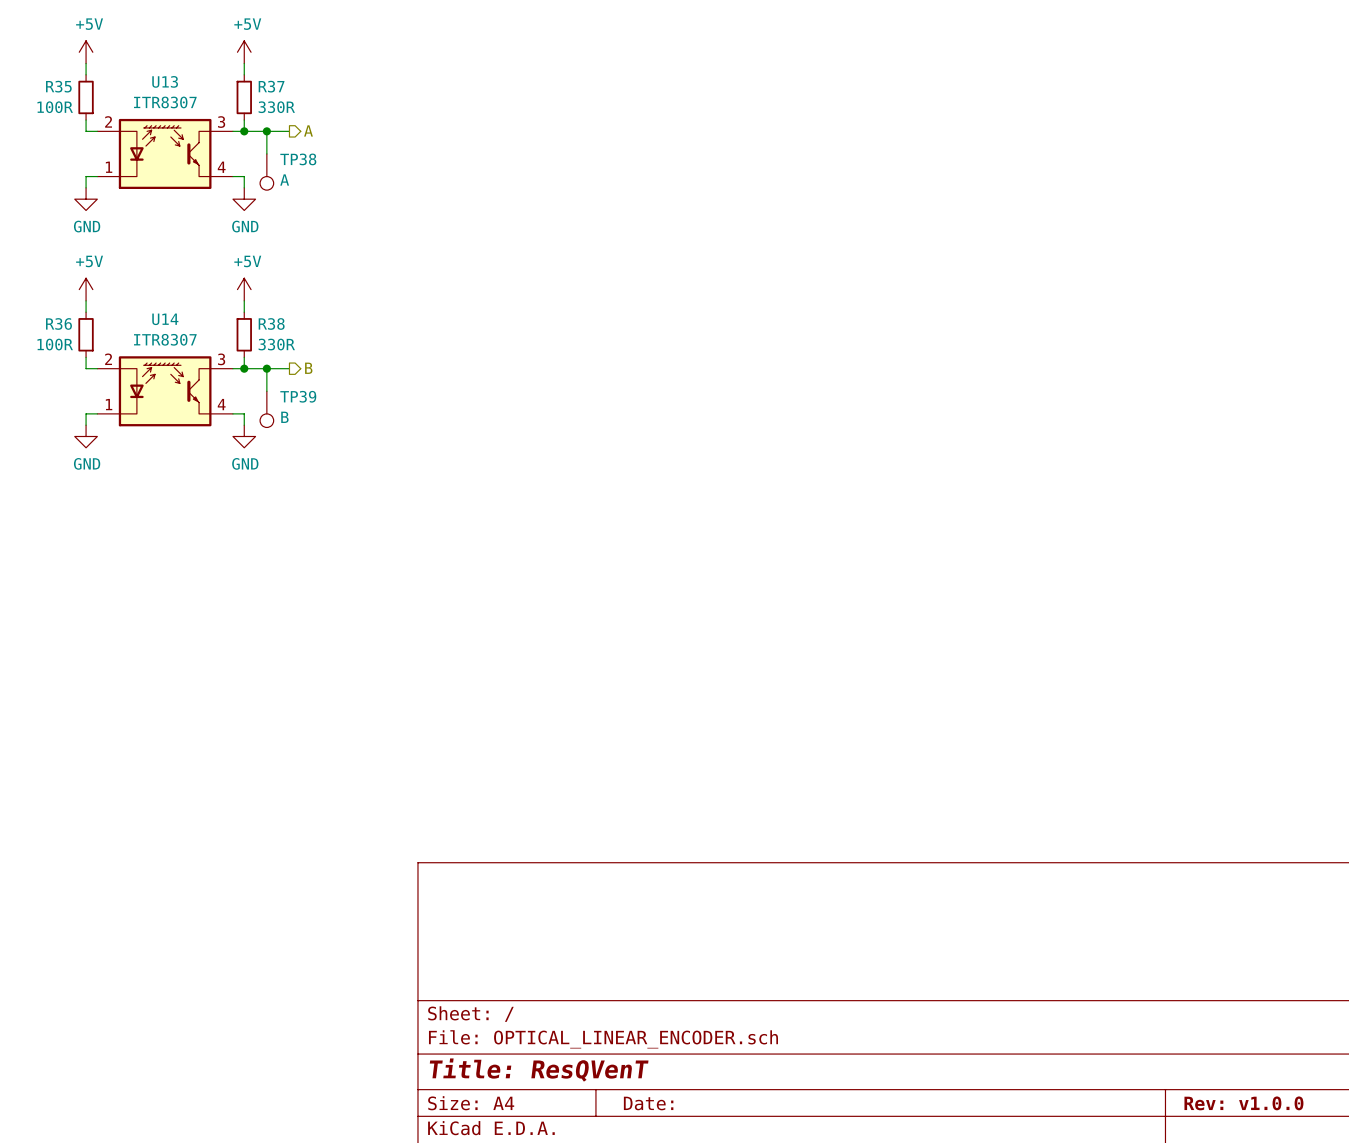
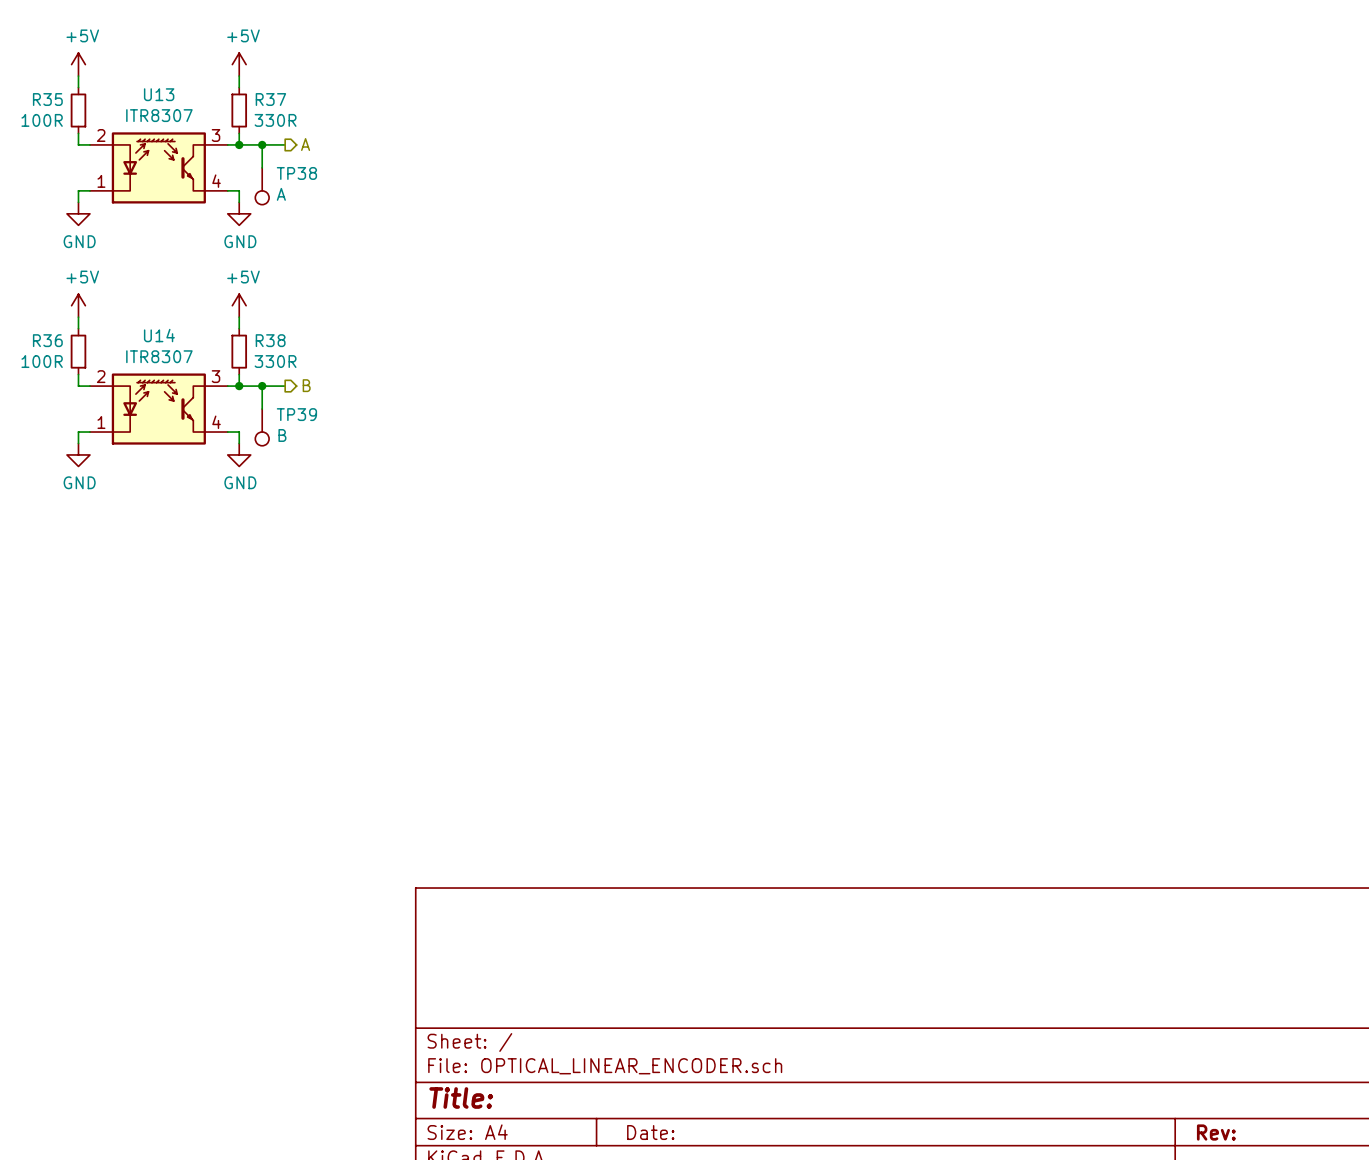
title block: Title: ResQVenT (539, 1070) -> Title: (461, 1097)
title block: Rev: v1.0.0 (1243, 1103) -> Rev: (1216, 1132)

